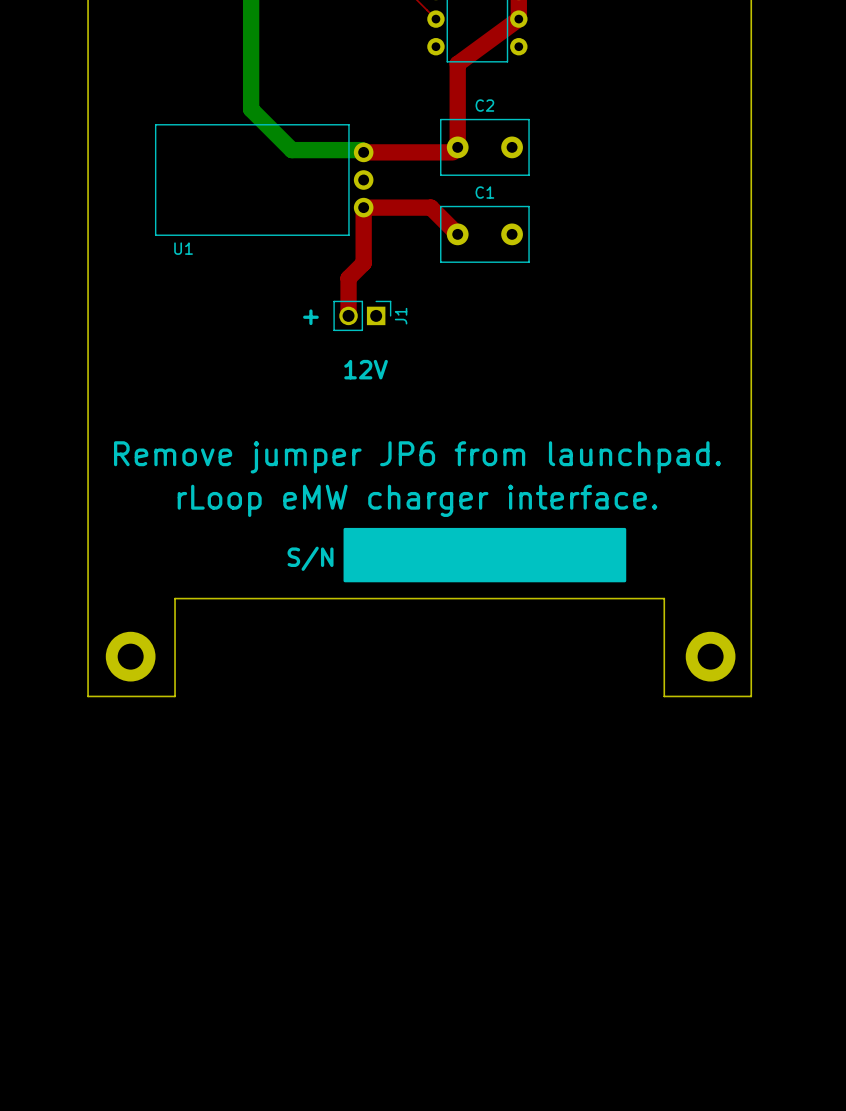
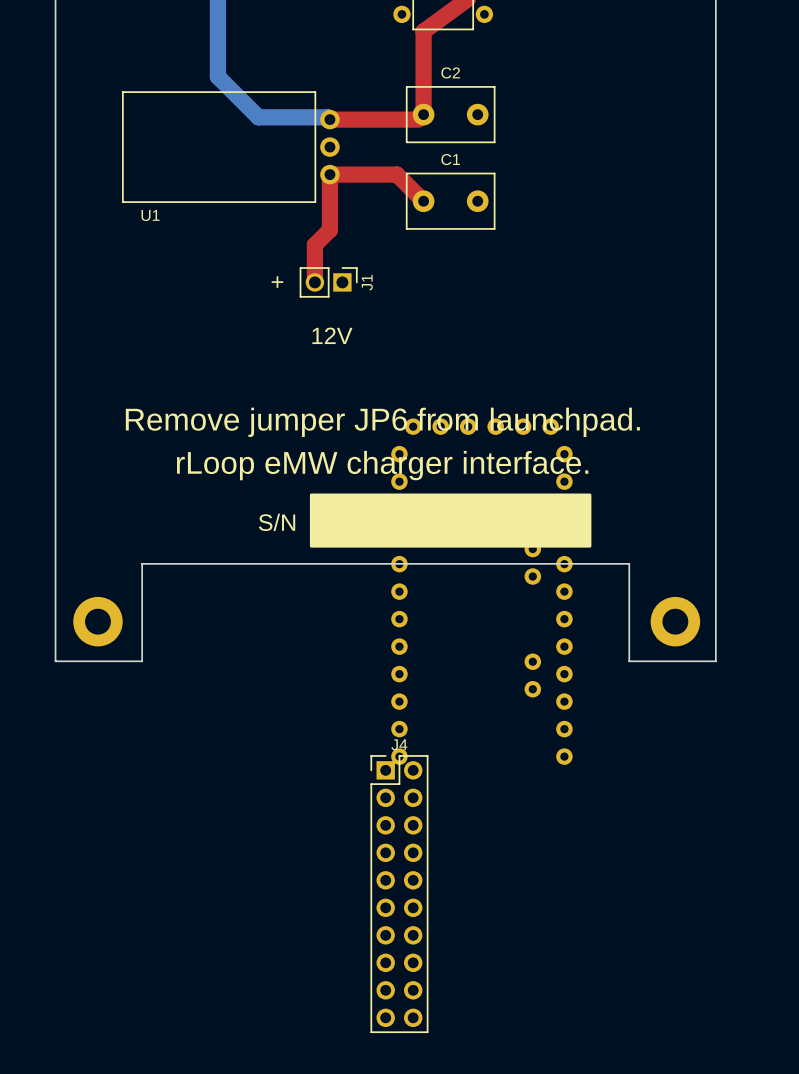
part: none -> (481, 591)
J4: none -> (399, 894)

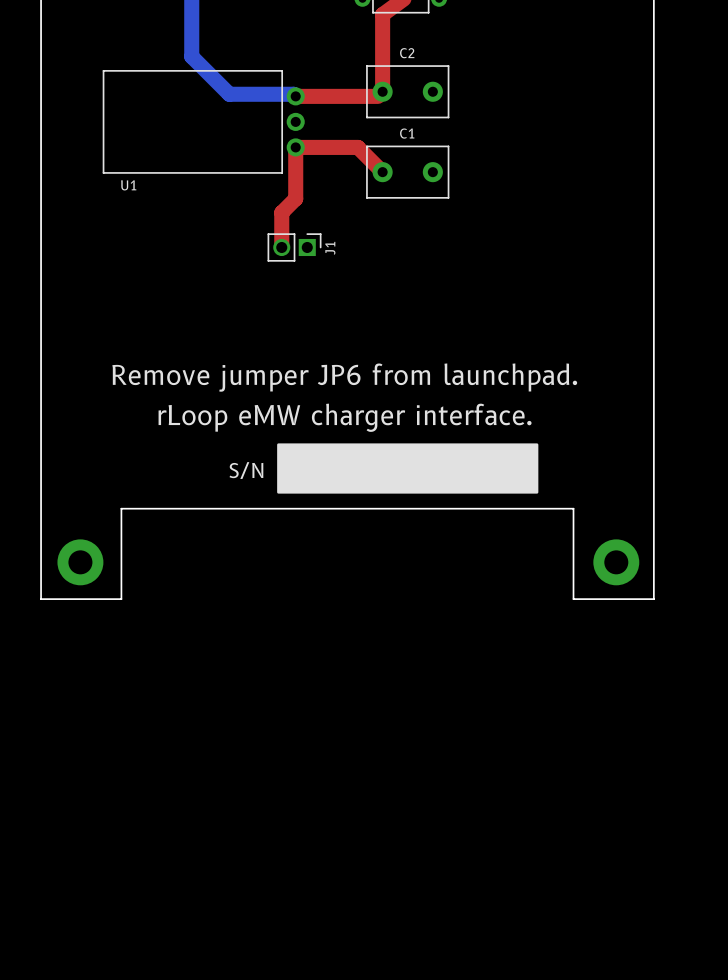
text: + (277, 282) -> none
text: 12V (332, 335) -> none
part: (481, 591) -> none
J4: (399, 894) -> none

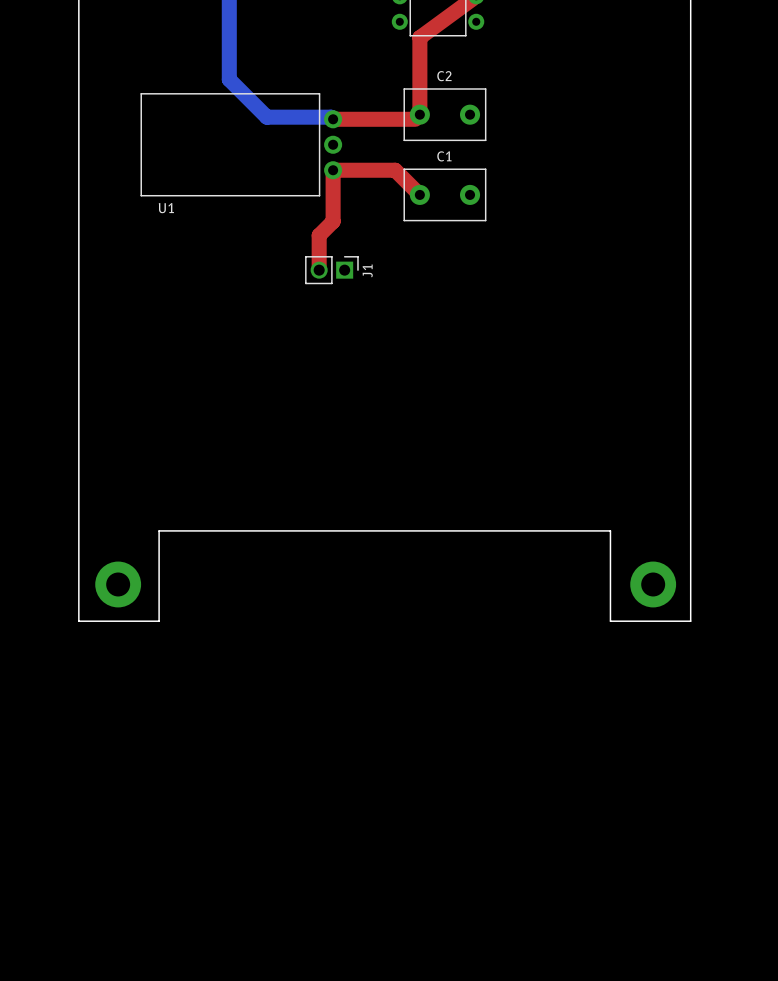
text: Remove jumper JP6 from launchpad. (344, 377) -> none
text: rLoop eMW charger interface. (345, 417) -> none
drawing: [277, 443, 539, 494] -> none
text: S/N (246, 470) -> none

